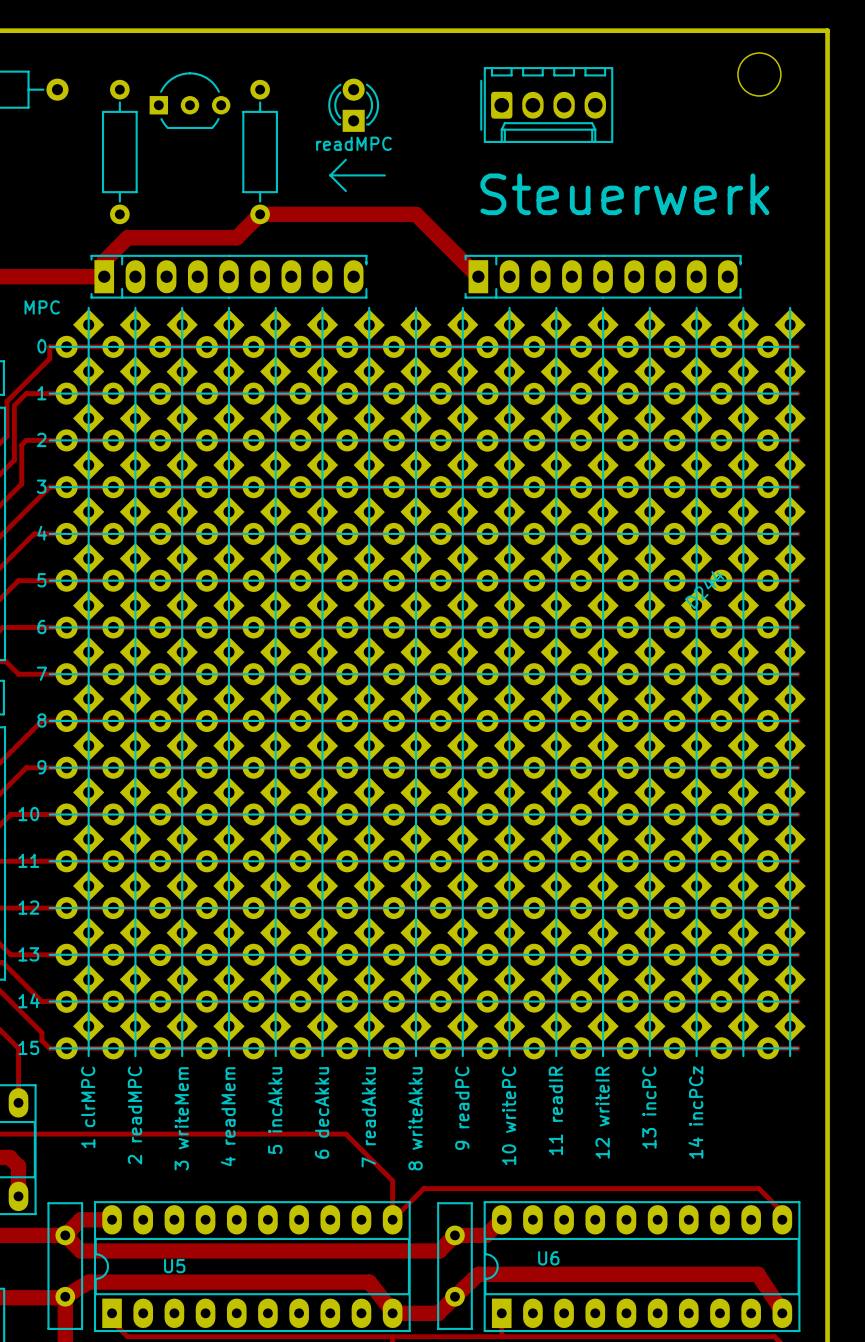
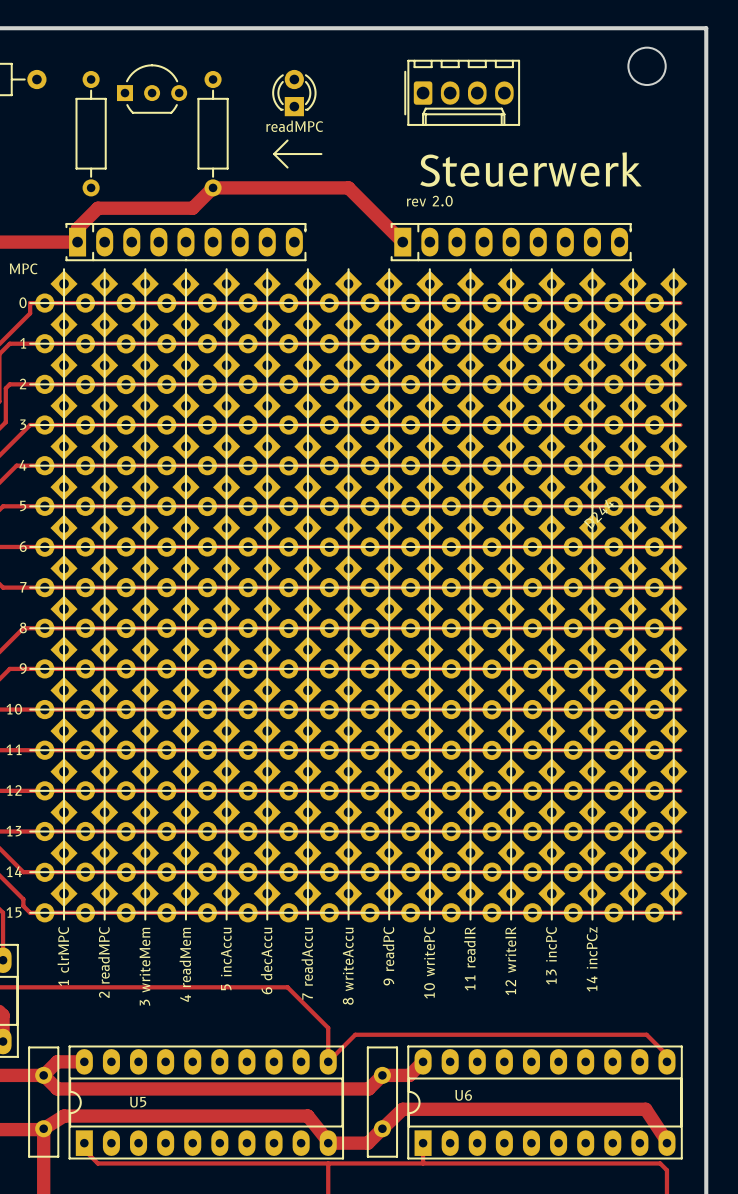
text: none -> rev 2.0 (429, 201)
text: 5 incAkku (275, 1110) -> 5 incAccu (226, 958)
text: 6 decAkku (322, 1112) -> 6 decAccu (266, 961)
text: 7 readAkku (368, 1117) -> 7 readAccu (307, 963)
text: 8 writeAkku (415, 1118) -> 8 writeAccu (348, 966)

